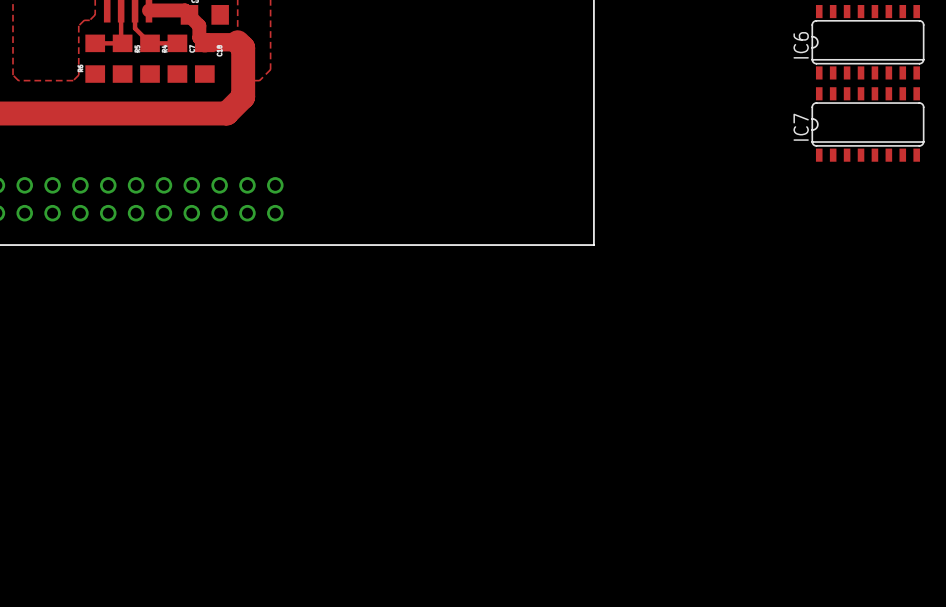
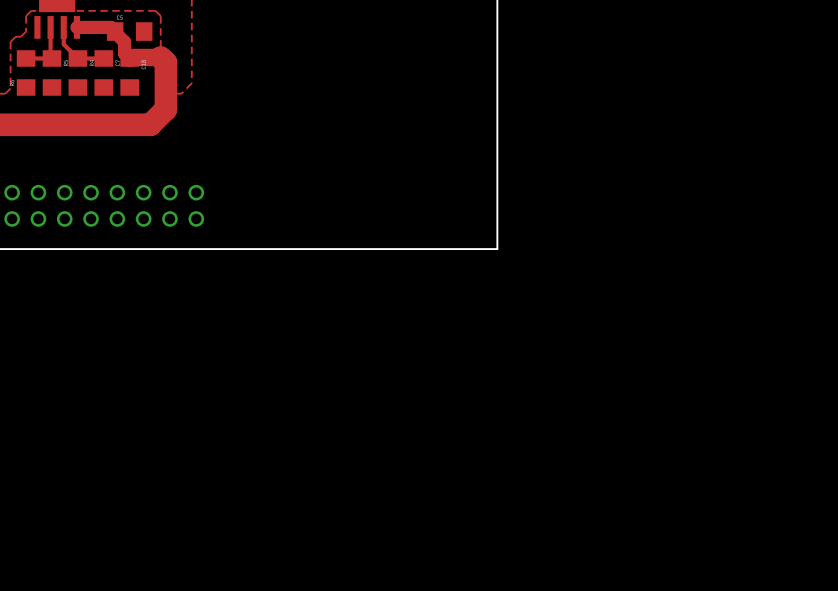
IC6: (867, 42) -> none
IC7: (867, 124) -> none

